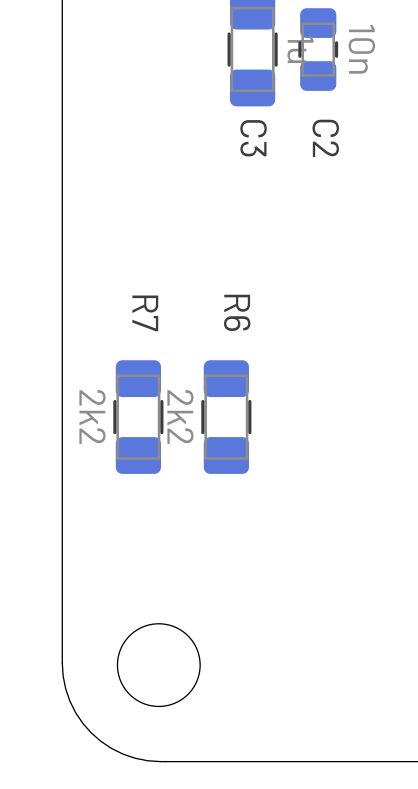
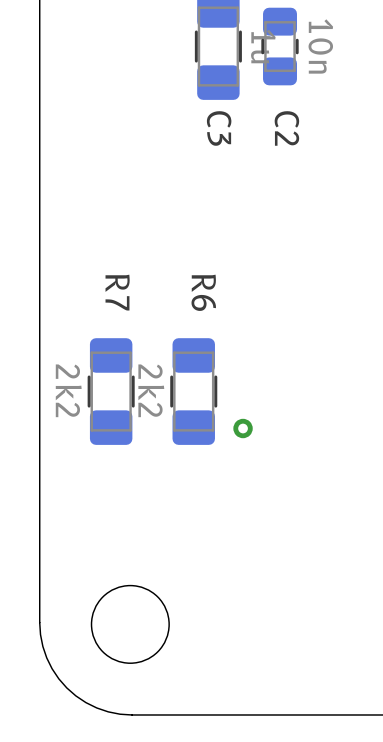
via: none -> (243, 428)

